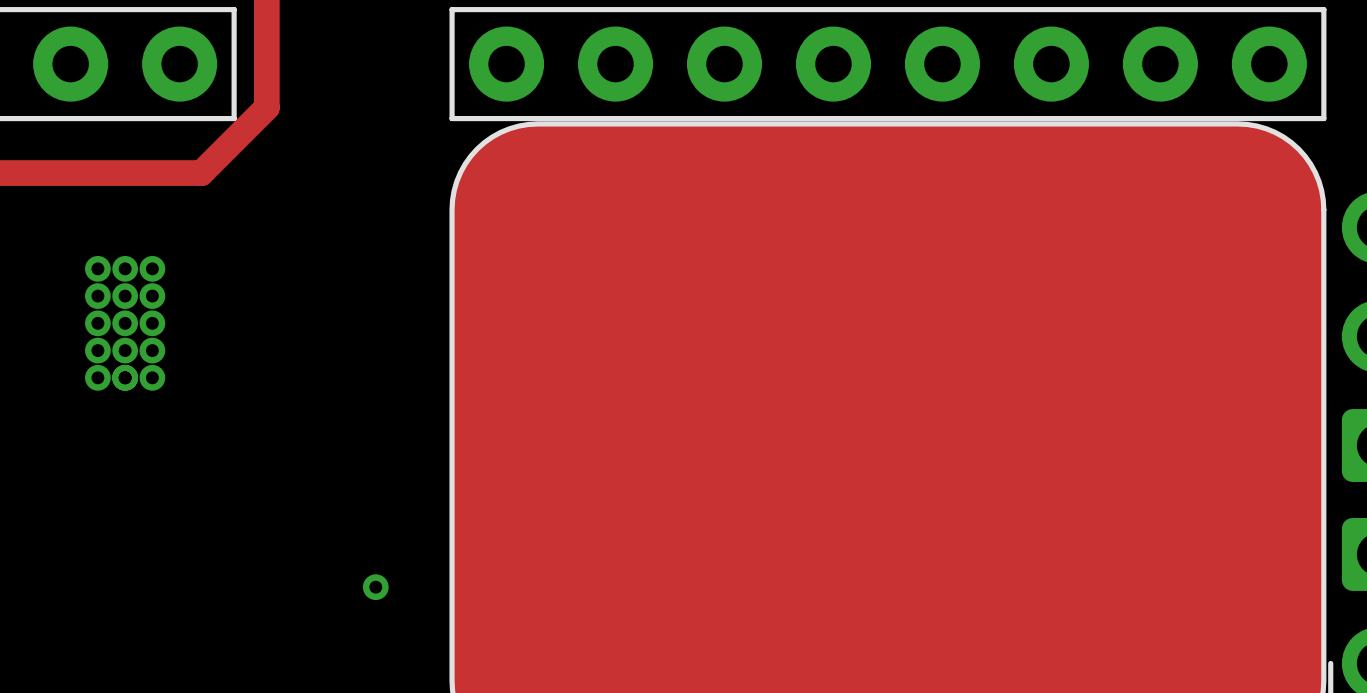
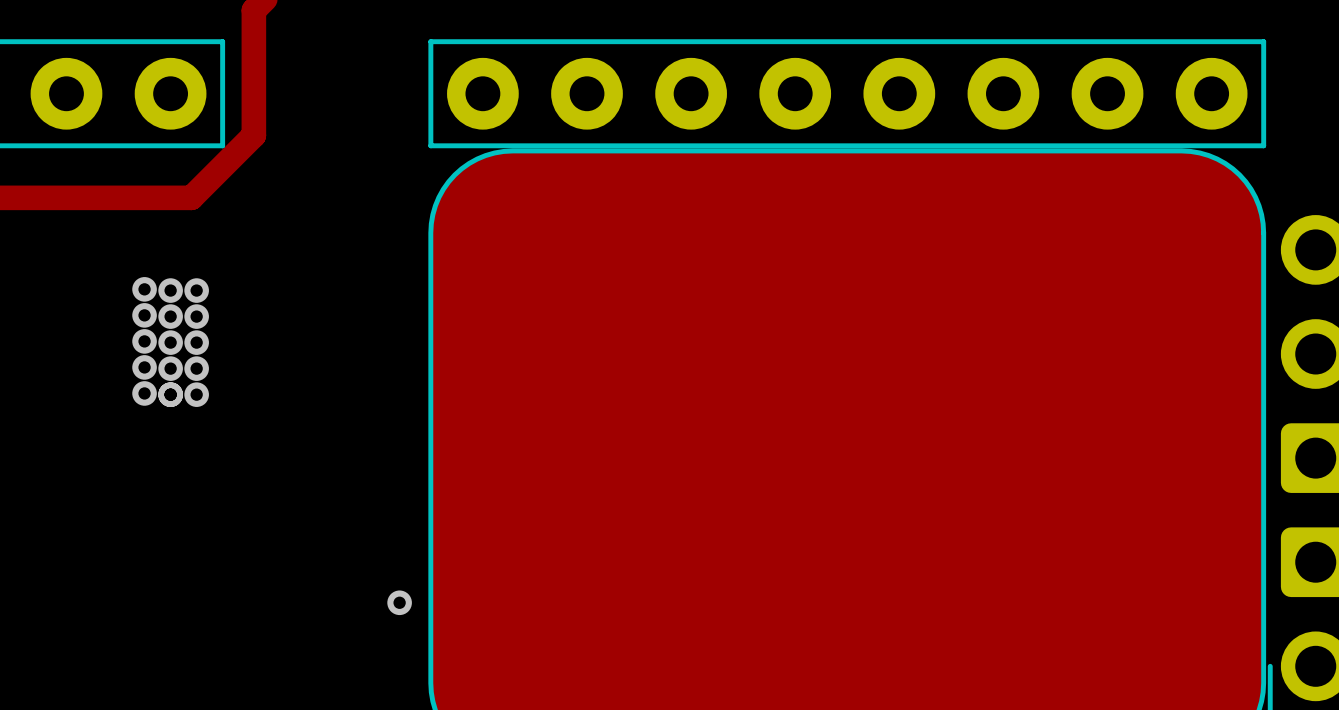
via: (97, 268) -> none
via: (125, 268) -> none
via: none -> (170, 290)
via: none -> (196, 290)
via: (97, 296) -> none
via: (125, 296) -> none
via: none -> (170, 316)
via: none -> (196, 316)
via: (97, 323) -> none
via: (125, 323) -> none
via: none -> (170, 342)
via: none -> (196, 342)
via: (97, 350) -> none
via: (125, 350) -> none
via: none -> (170, 368)
via: none -> (196, 368)
via: (97, 377) -> none
via: (125, 377) -> none
via: none -> (170, 394)
via: none -> (196, 394)
via position: (375, 587) -> (399, 602)

